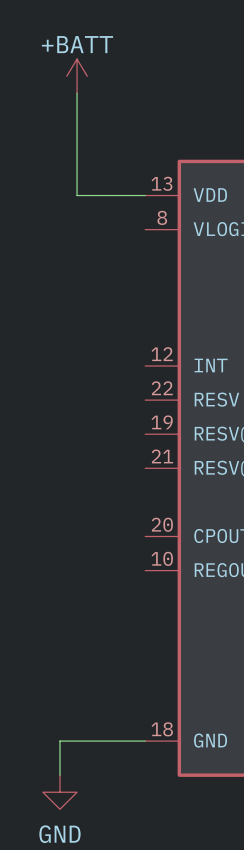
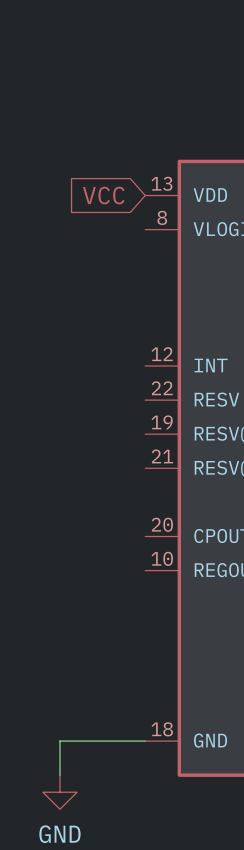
power symbol: +BATT (77, 76) -> none
wire: (77, 93) (77, 195) (145, 195) -> none
global label: none -> VCC (103, 195)

